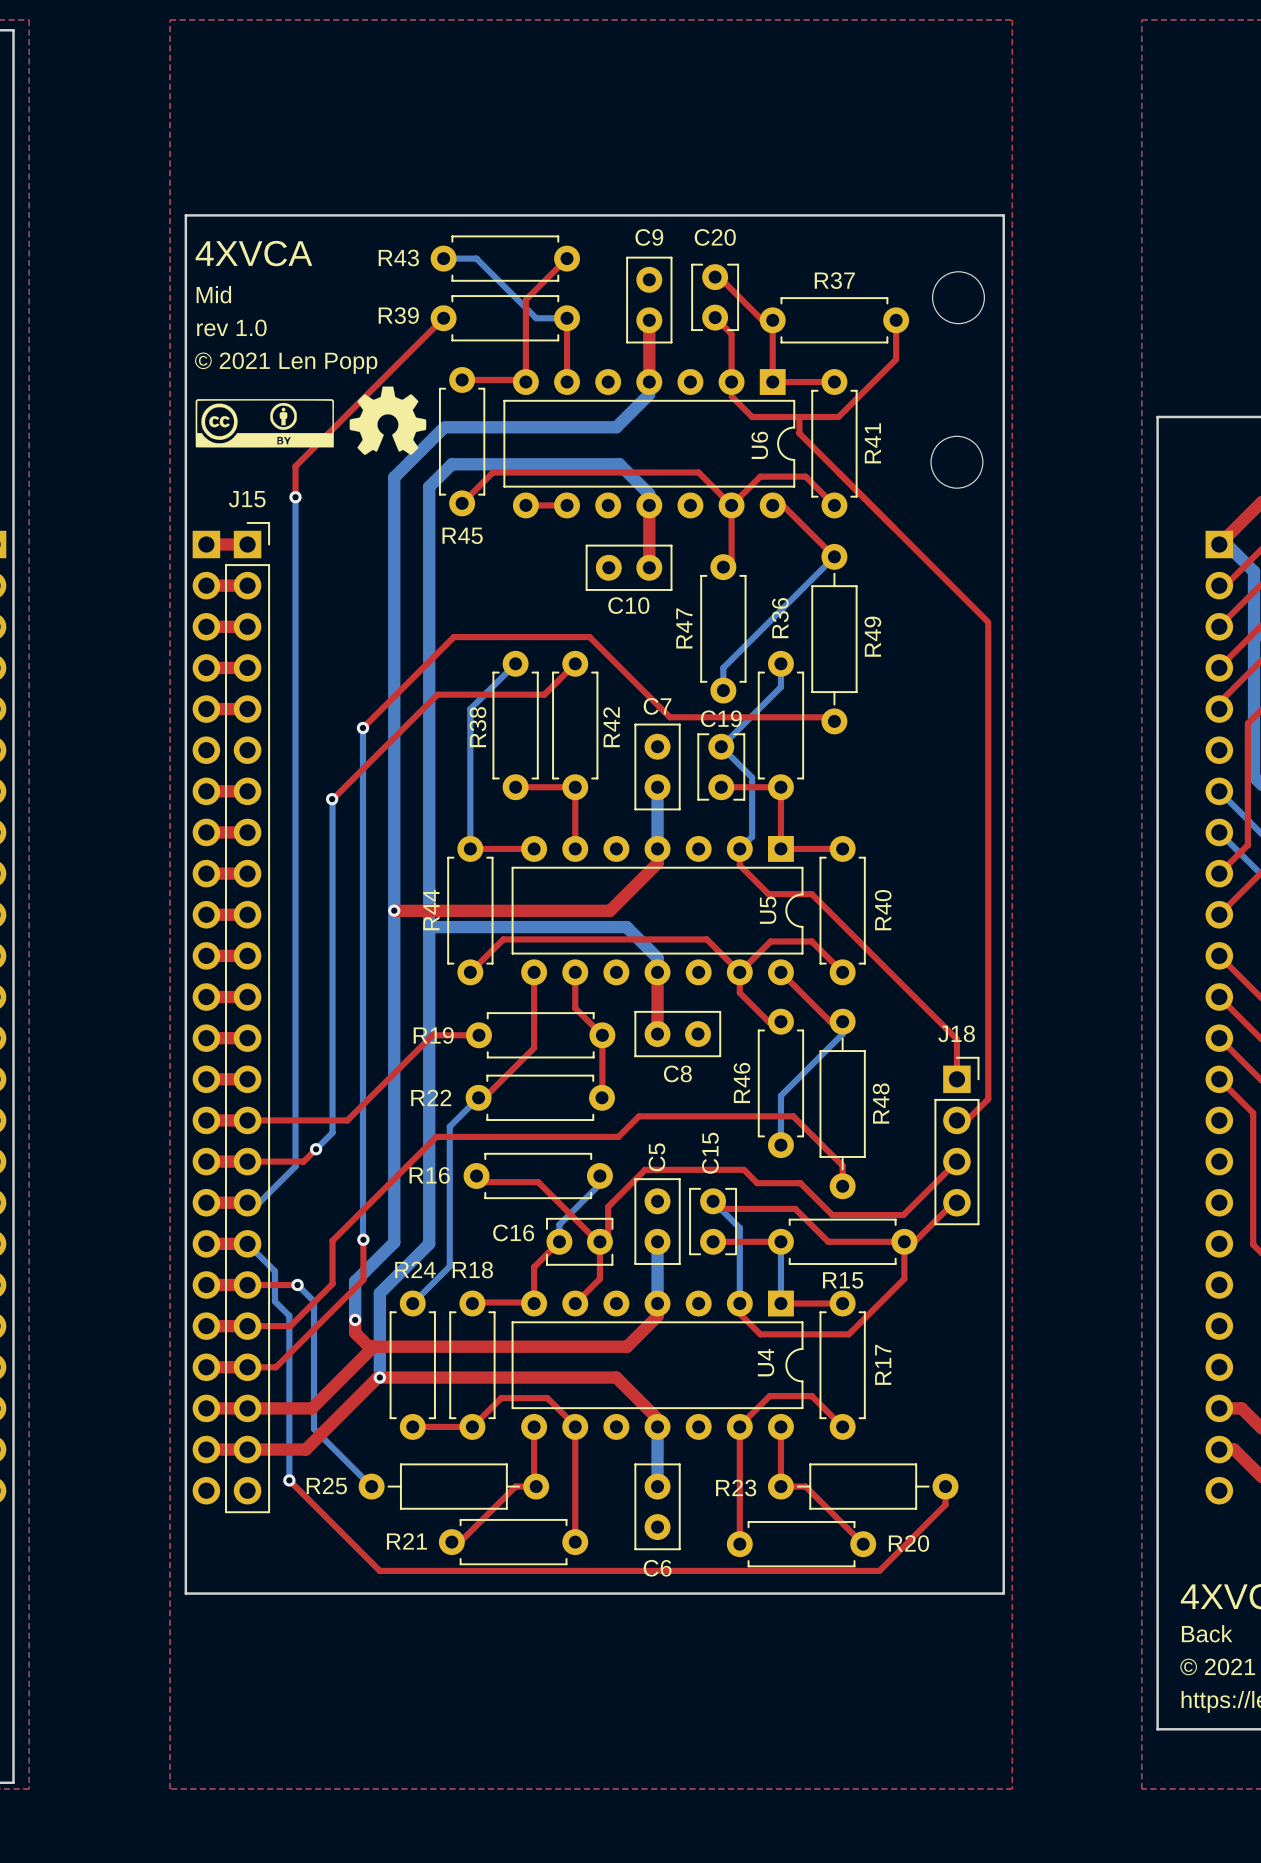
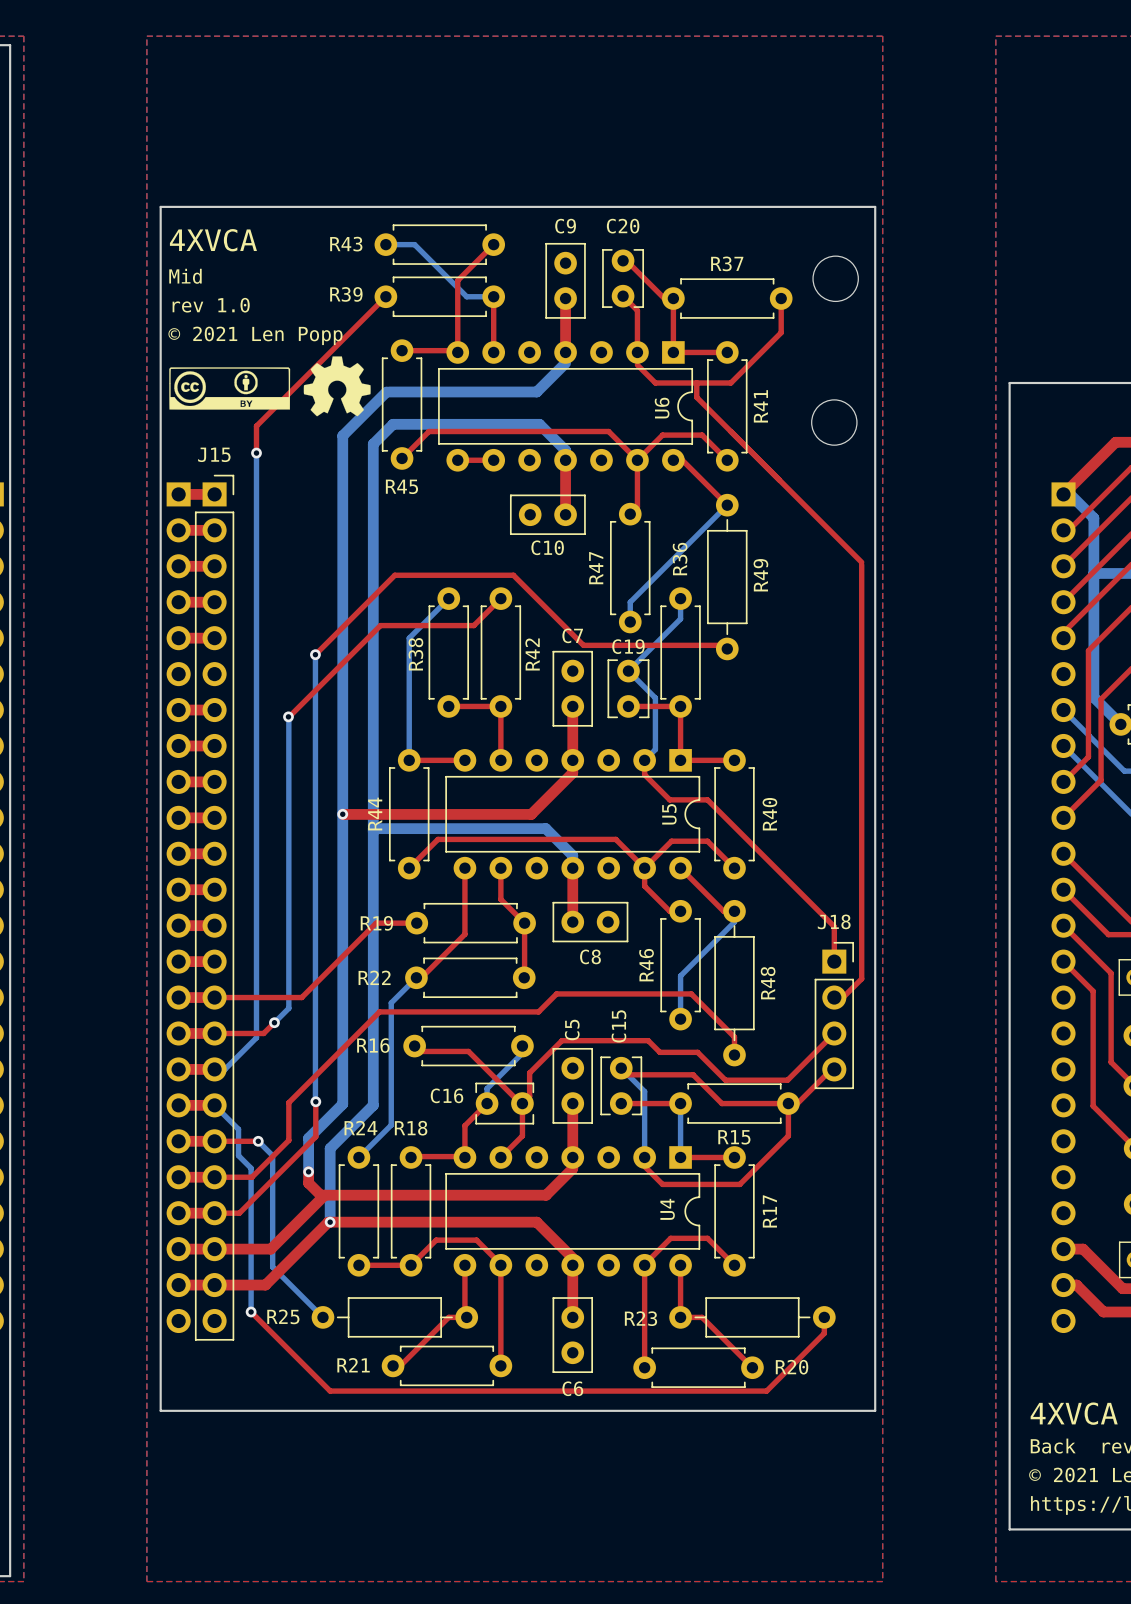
top track: none -> (572, 706) (572, 760)
bottom track: (657, 787) (657, 848) -> none
top track: none -> (572, 1103) (572, 1157)
bottom track: (657, 1241) (657, 1303) -> none
top track: none -> (572, 1264) (572, 1317)
bottom track: (657, 1425) (657, 1486) -> none

